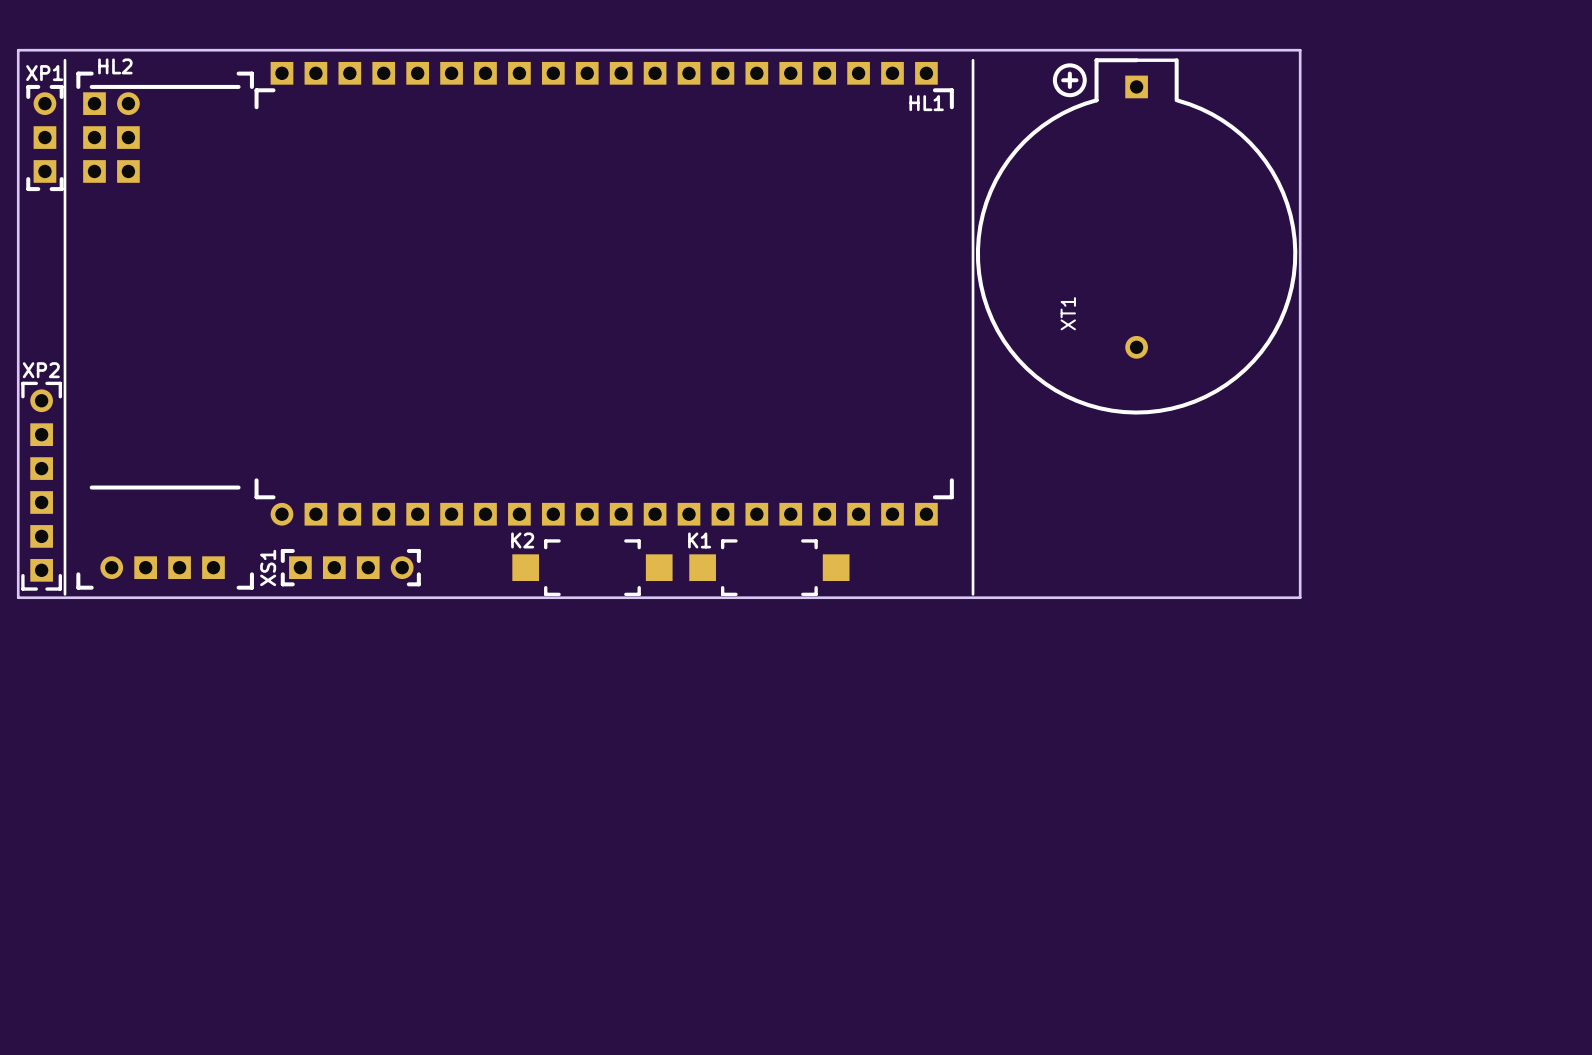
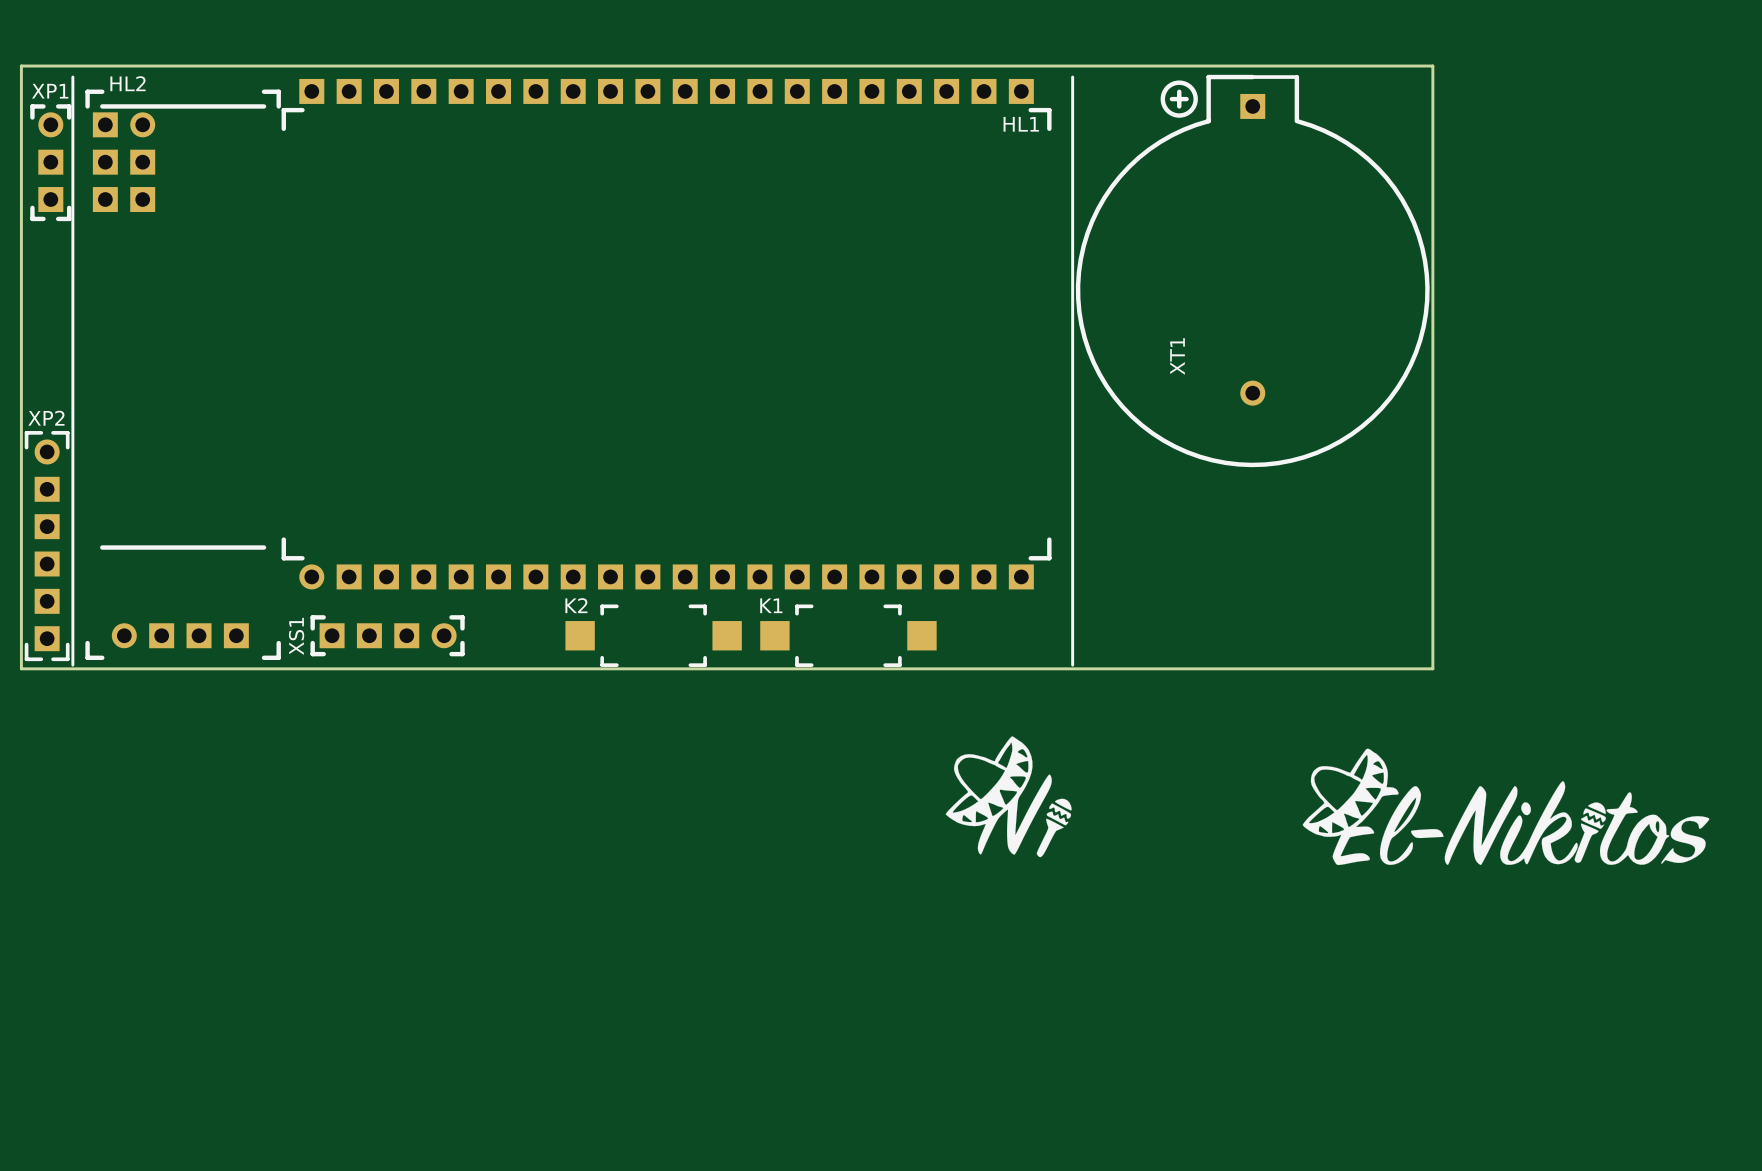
drawing: none -> [945, 736, 1072, 858]
drawing: none -> [1302, 748, 1710, 866]

